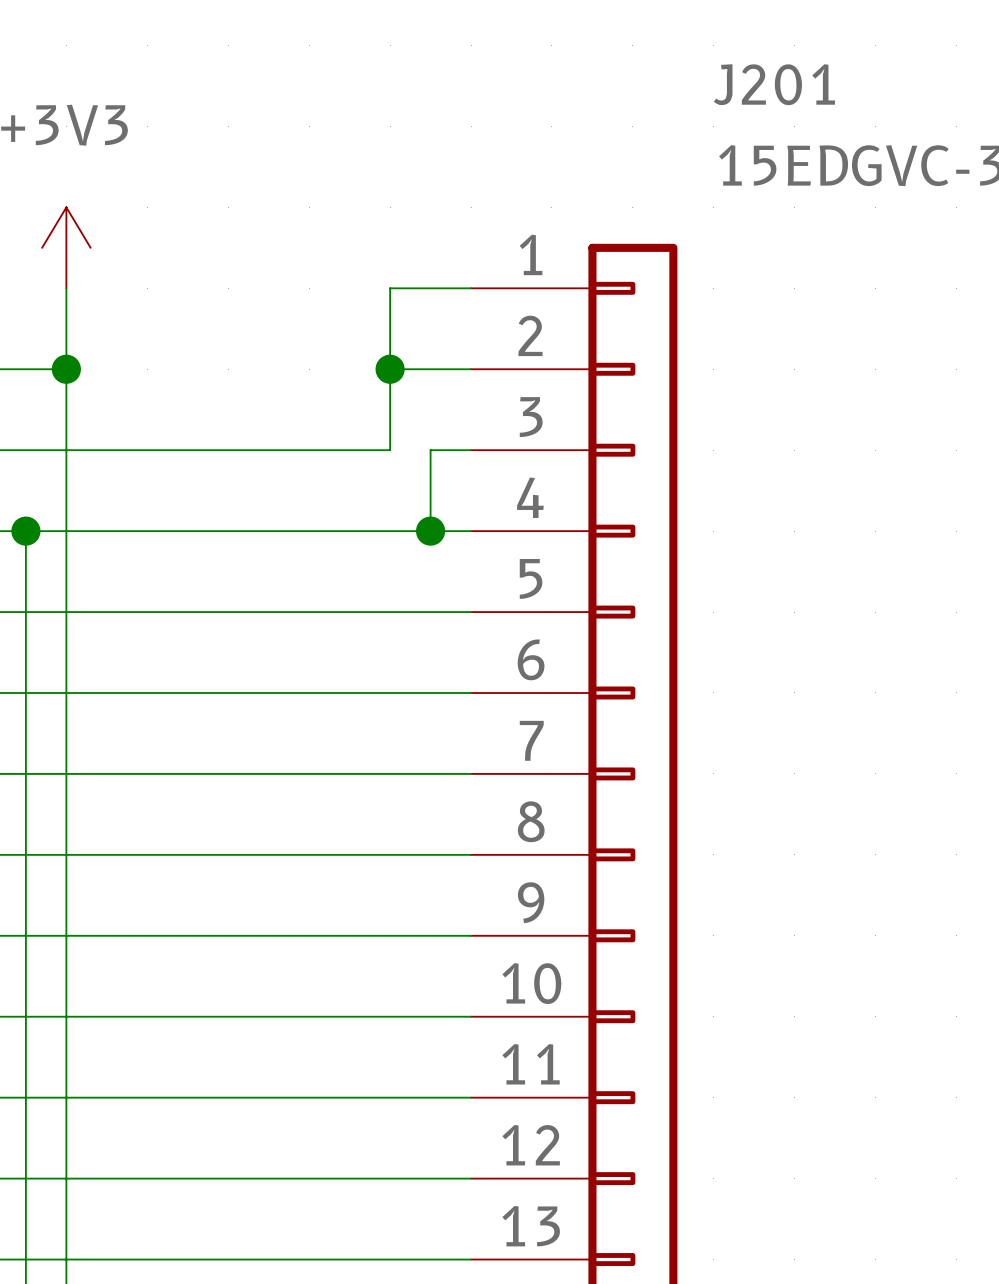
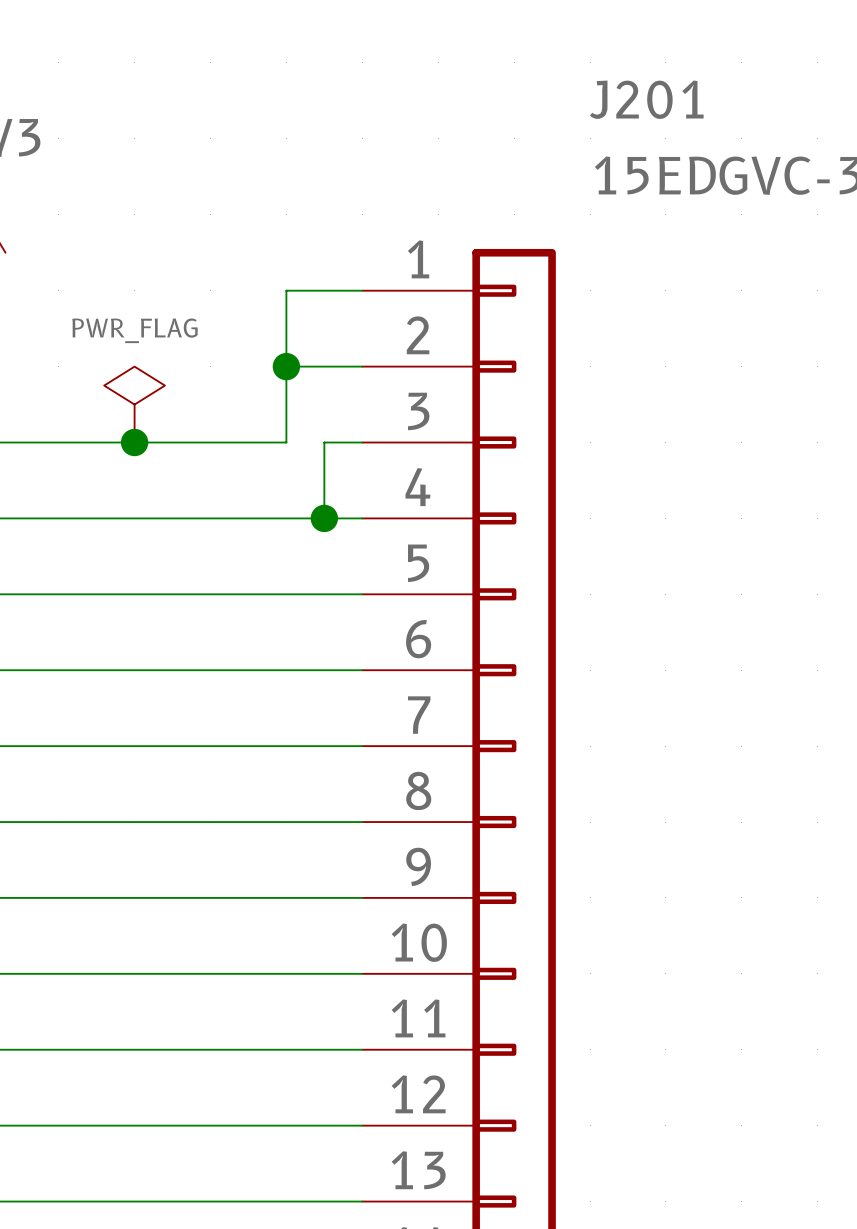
power symbol: none -> PWR_FLAG (134, 404)
junction: none -> (134, 442)

